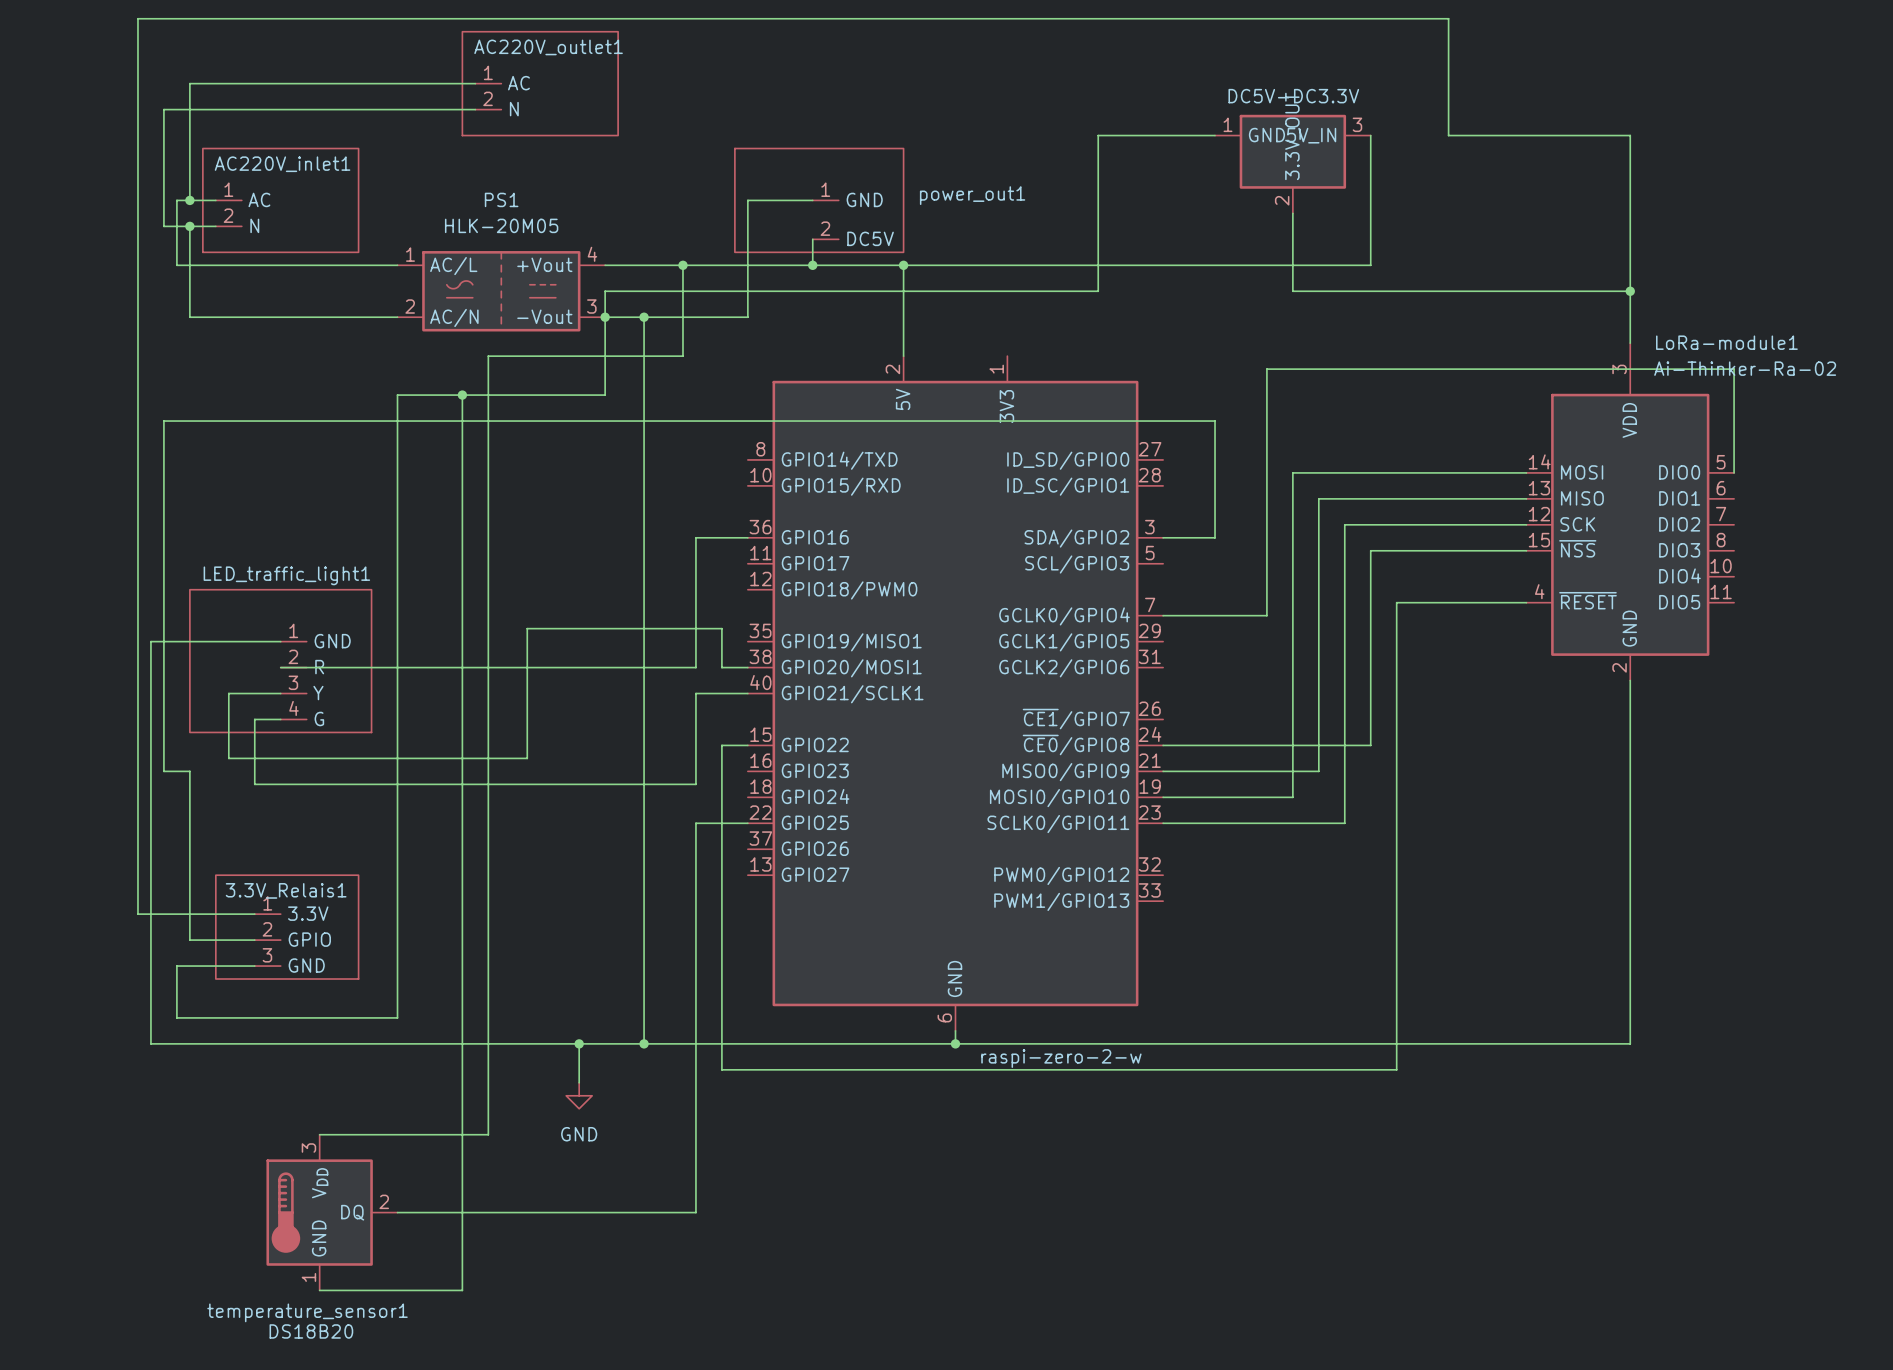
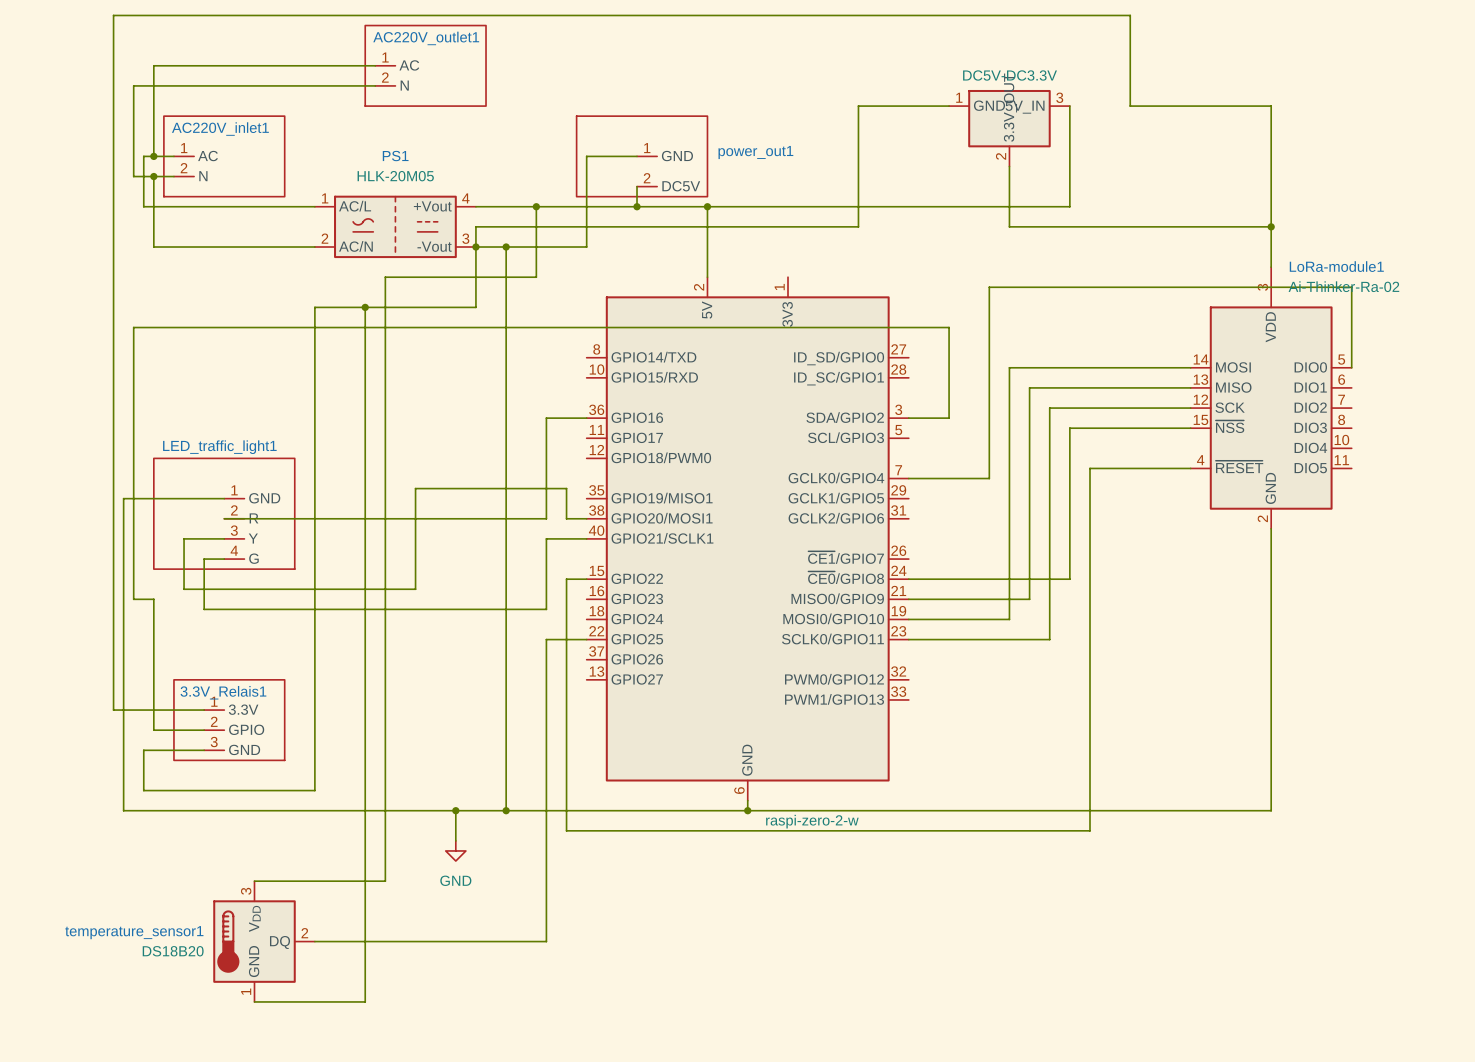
temperature_sensor1 name position: temperature_sensor1 (307, 1312) -> temperature_sensor1 (134, 932)
temperature_sensor1 value position: DS18B20 (311, 1331) -> DS18B20 (173, 951)

